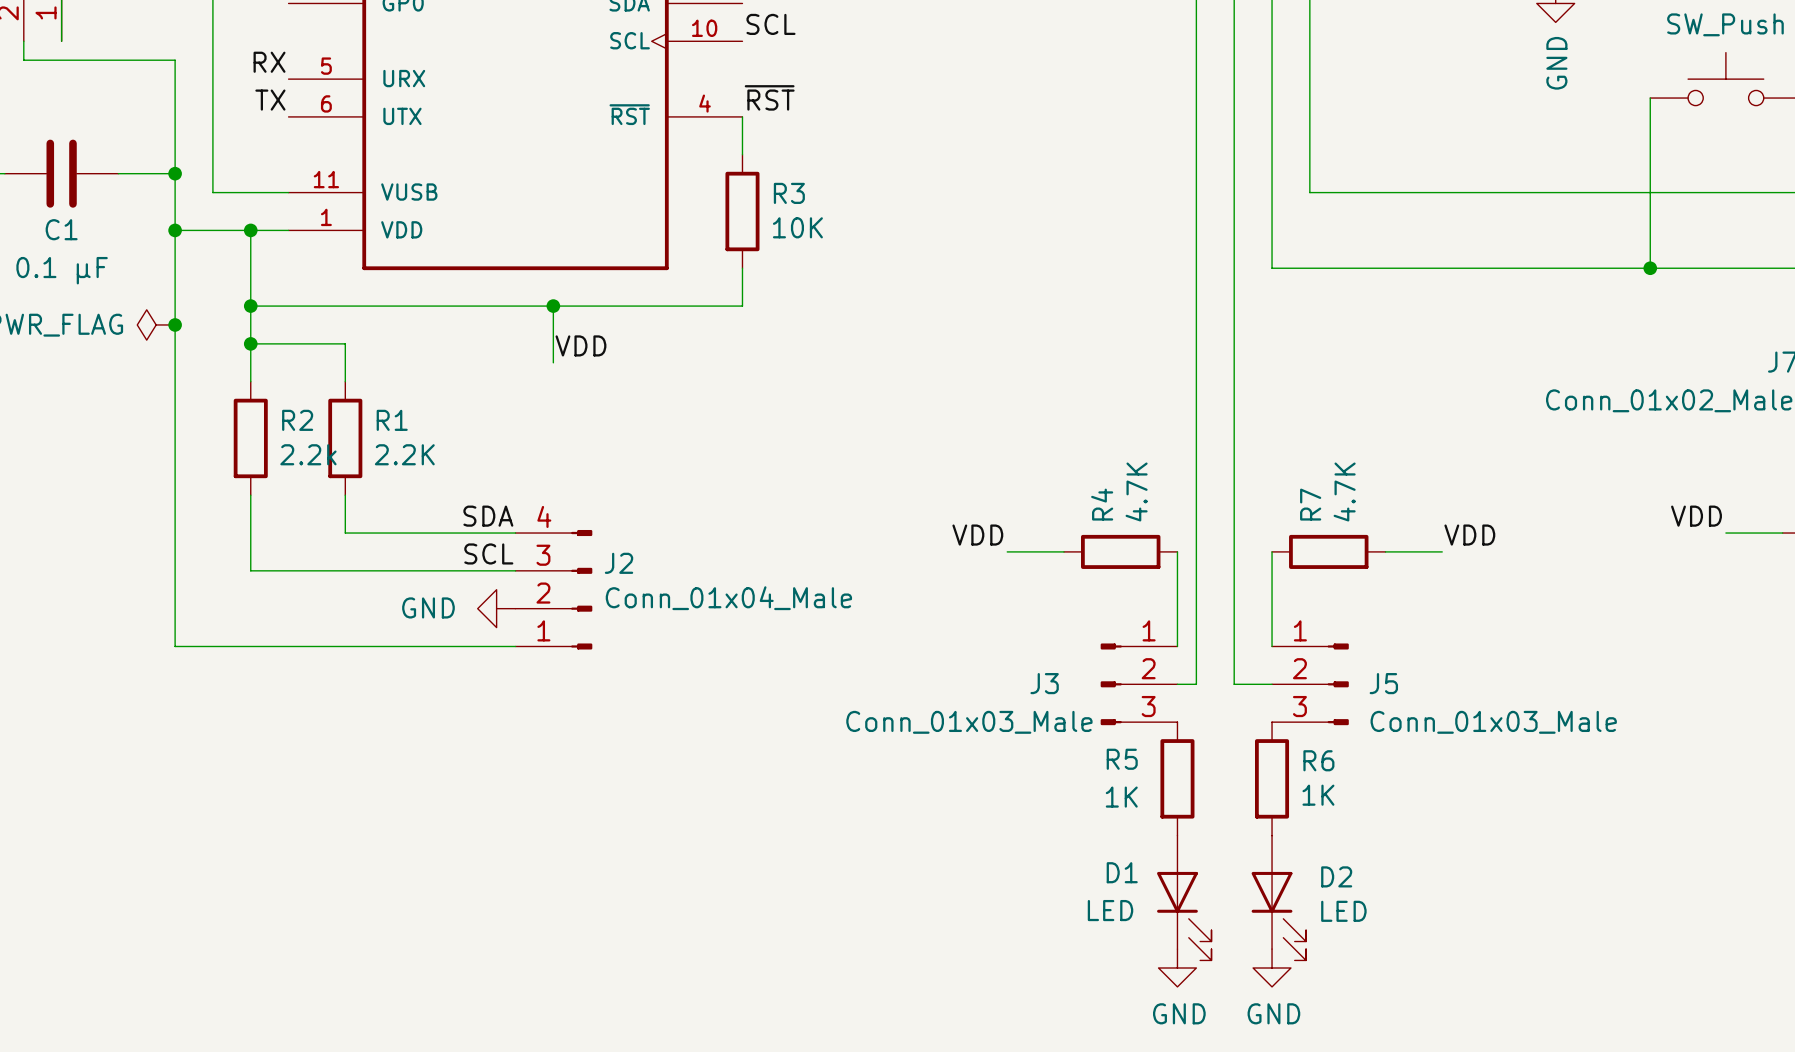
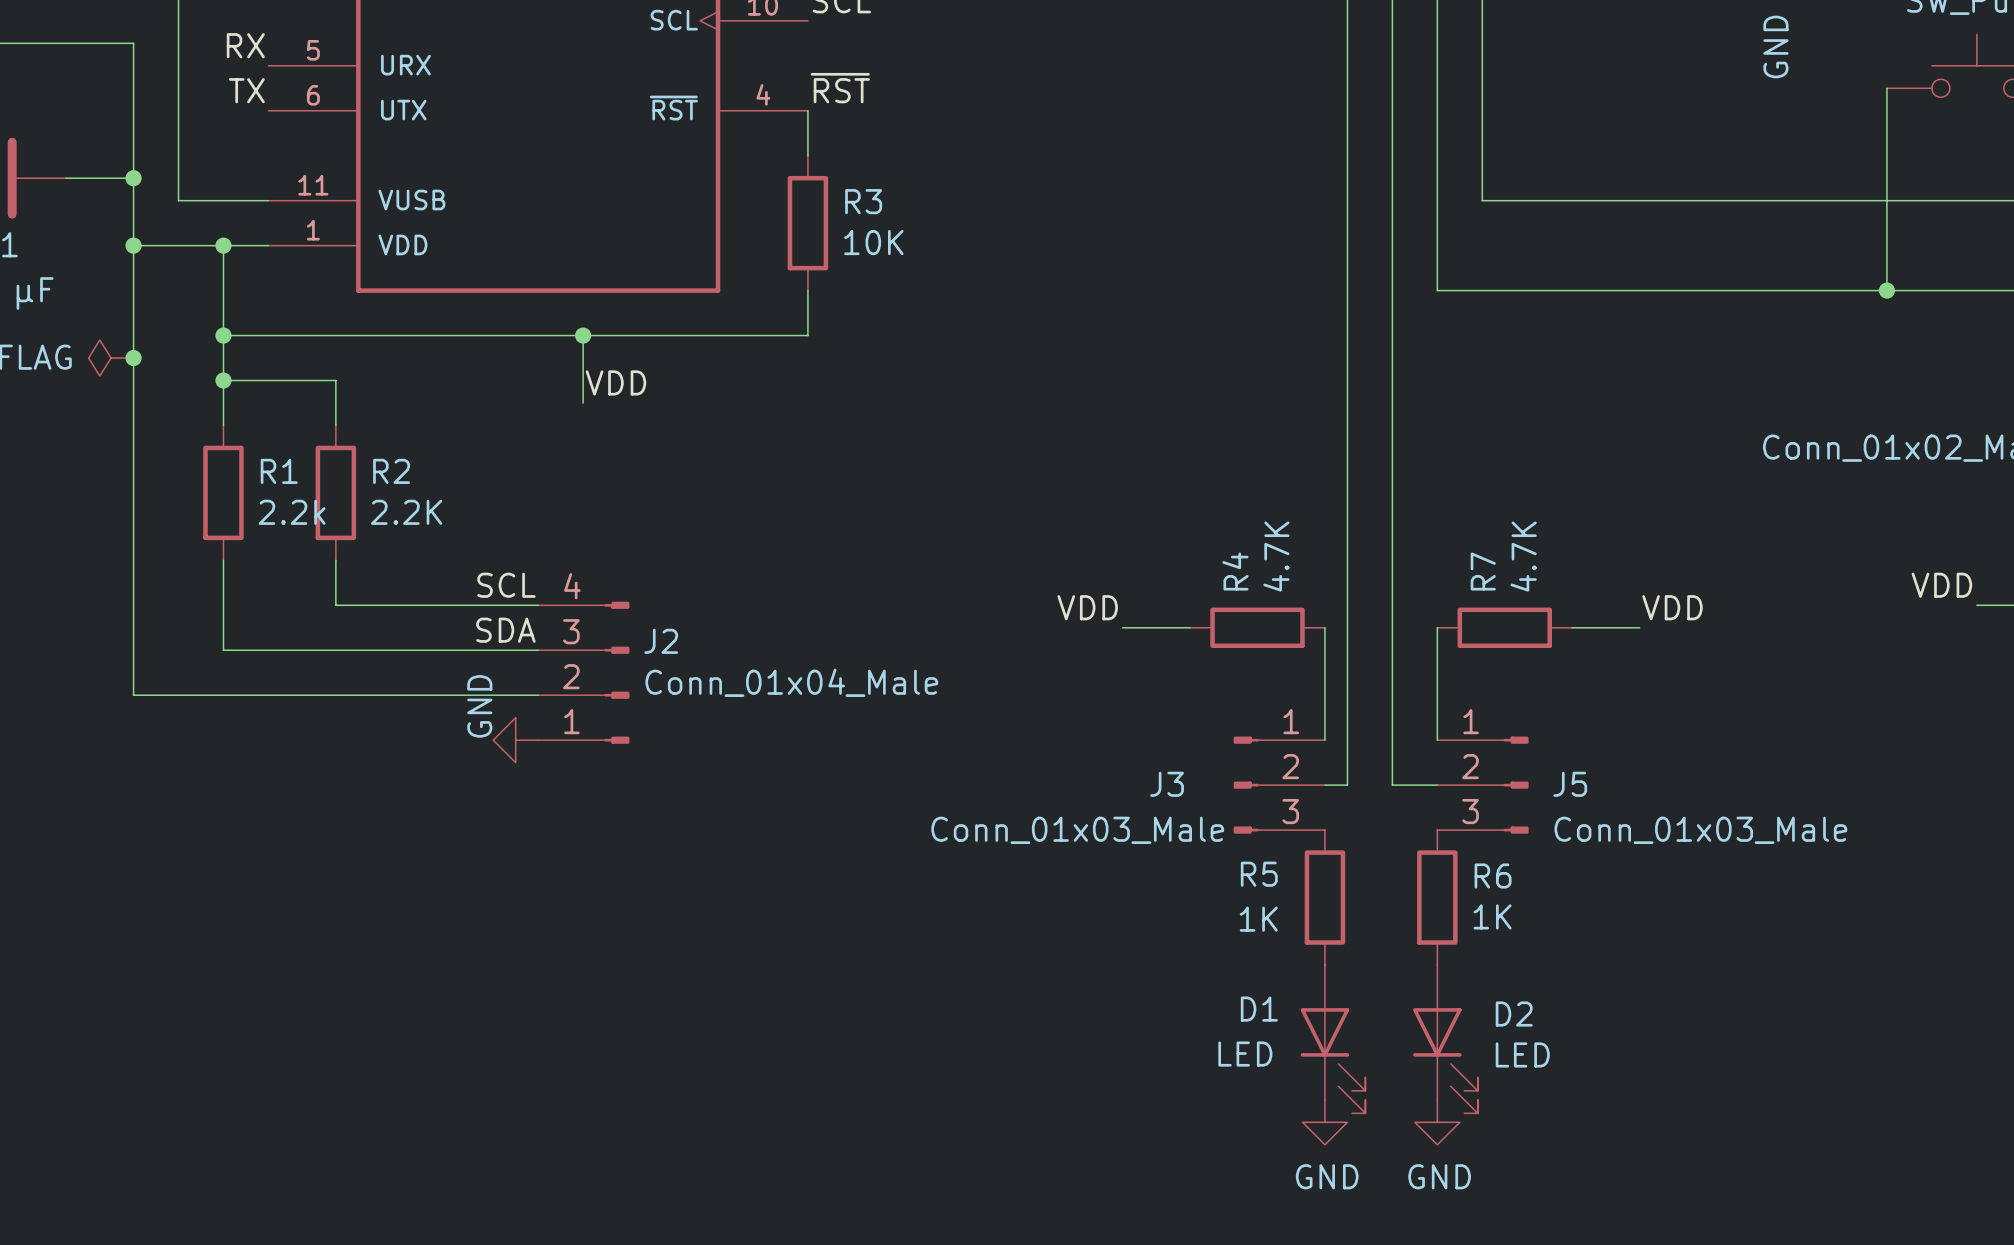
R2 name: R2 (297, 420) -> R1 (279, 471)
R1 name: R1 (392, 420) -> R2 (391, 471)
label: SDA (488, 516) -> SCL (506, 585)
label: SCL (488, 553) -> SDA (505, 630)
power symbol text rotation: 0° (428, 607) -> 90° counterclockwise (479, 706)
wire: (175, 608) (175, 646) (515, 646) -> (133, 695) (538, 695)
power symbol position: GND (496, 608) -> GND (515, 740)

